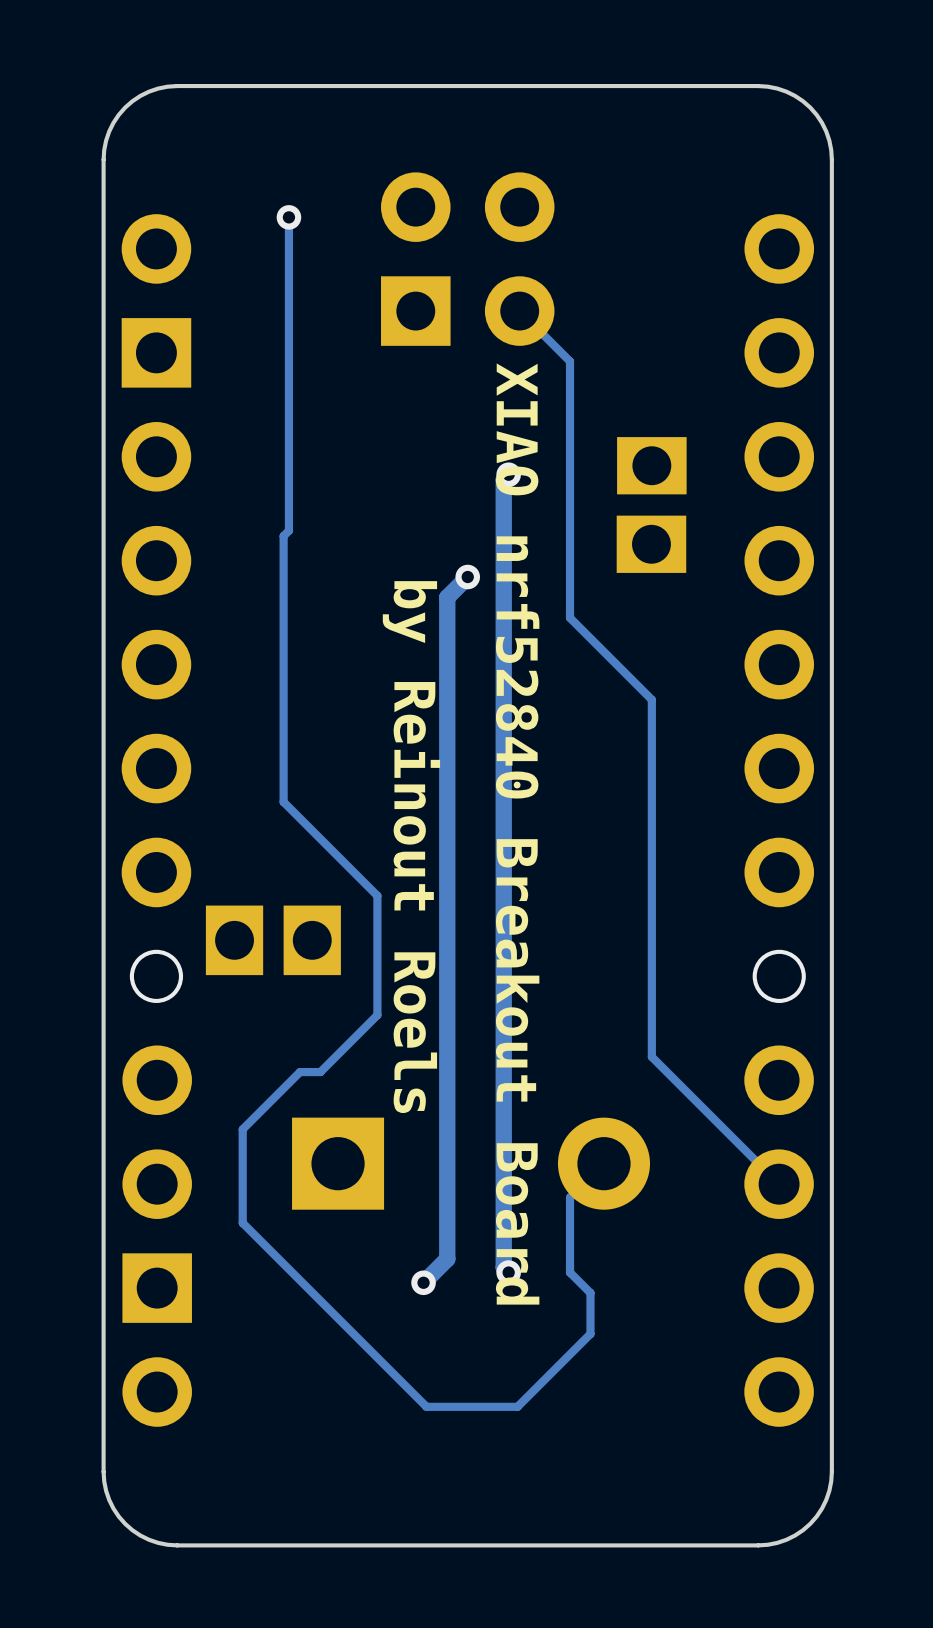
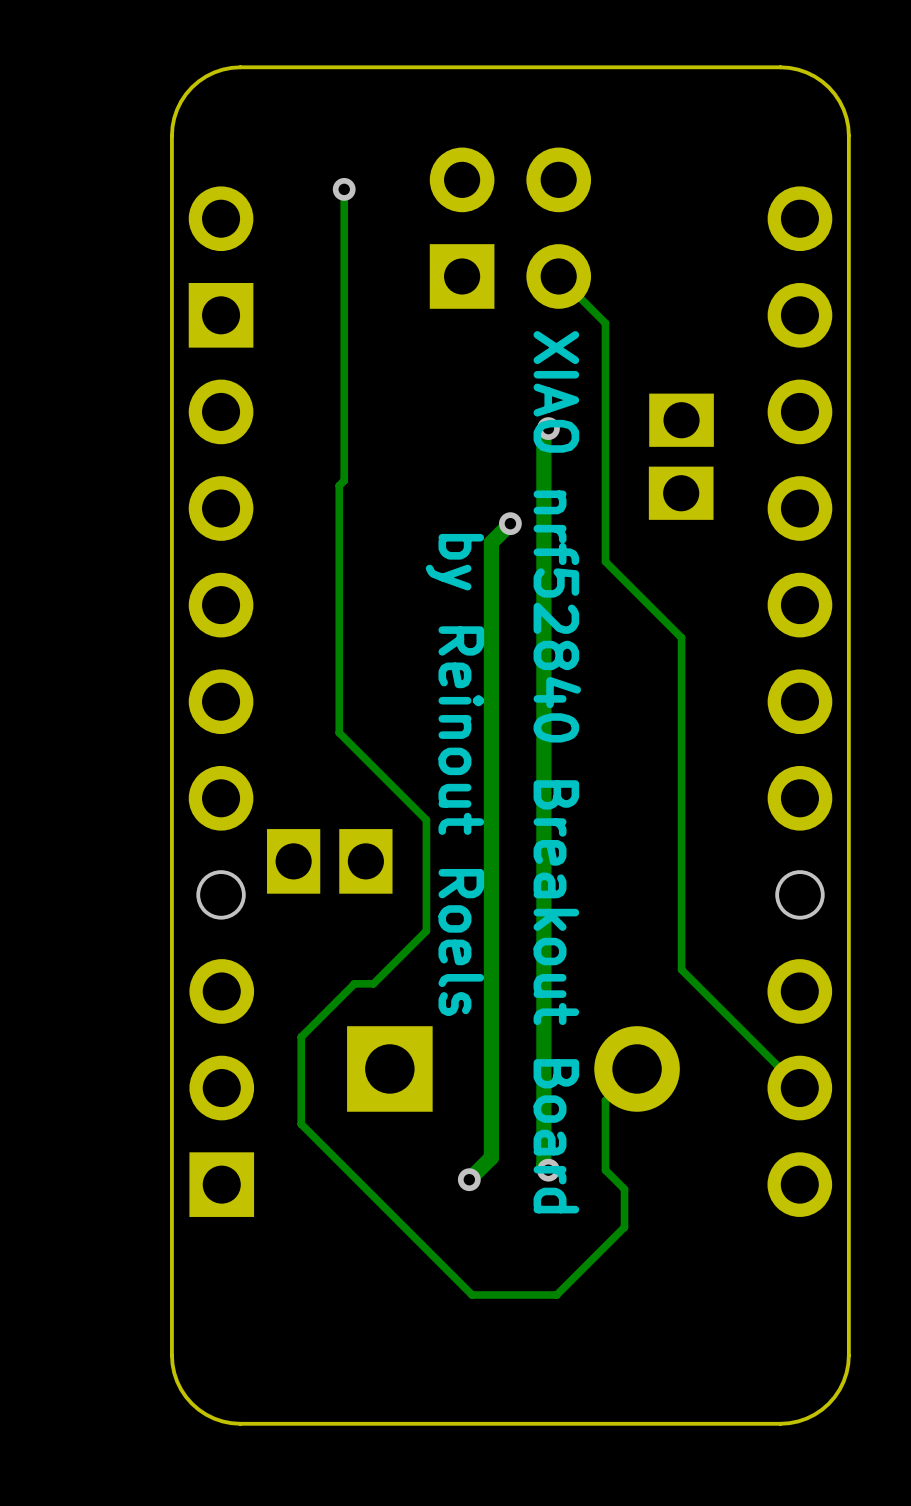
part: (157, 1236) -> none
part: (779, 1236) -> none

